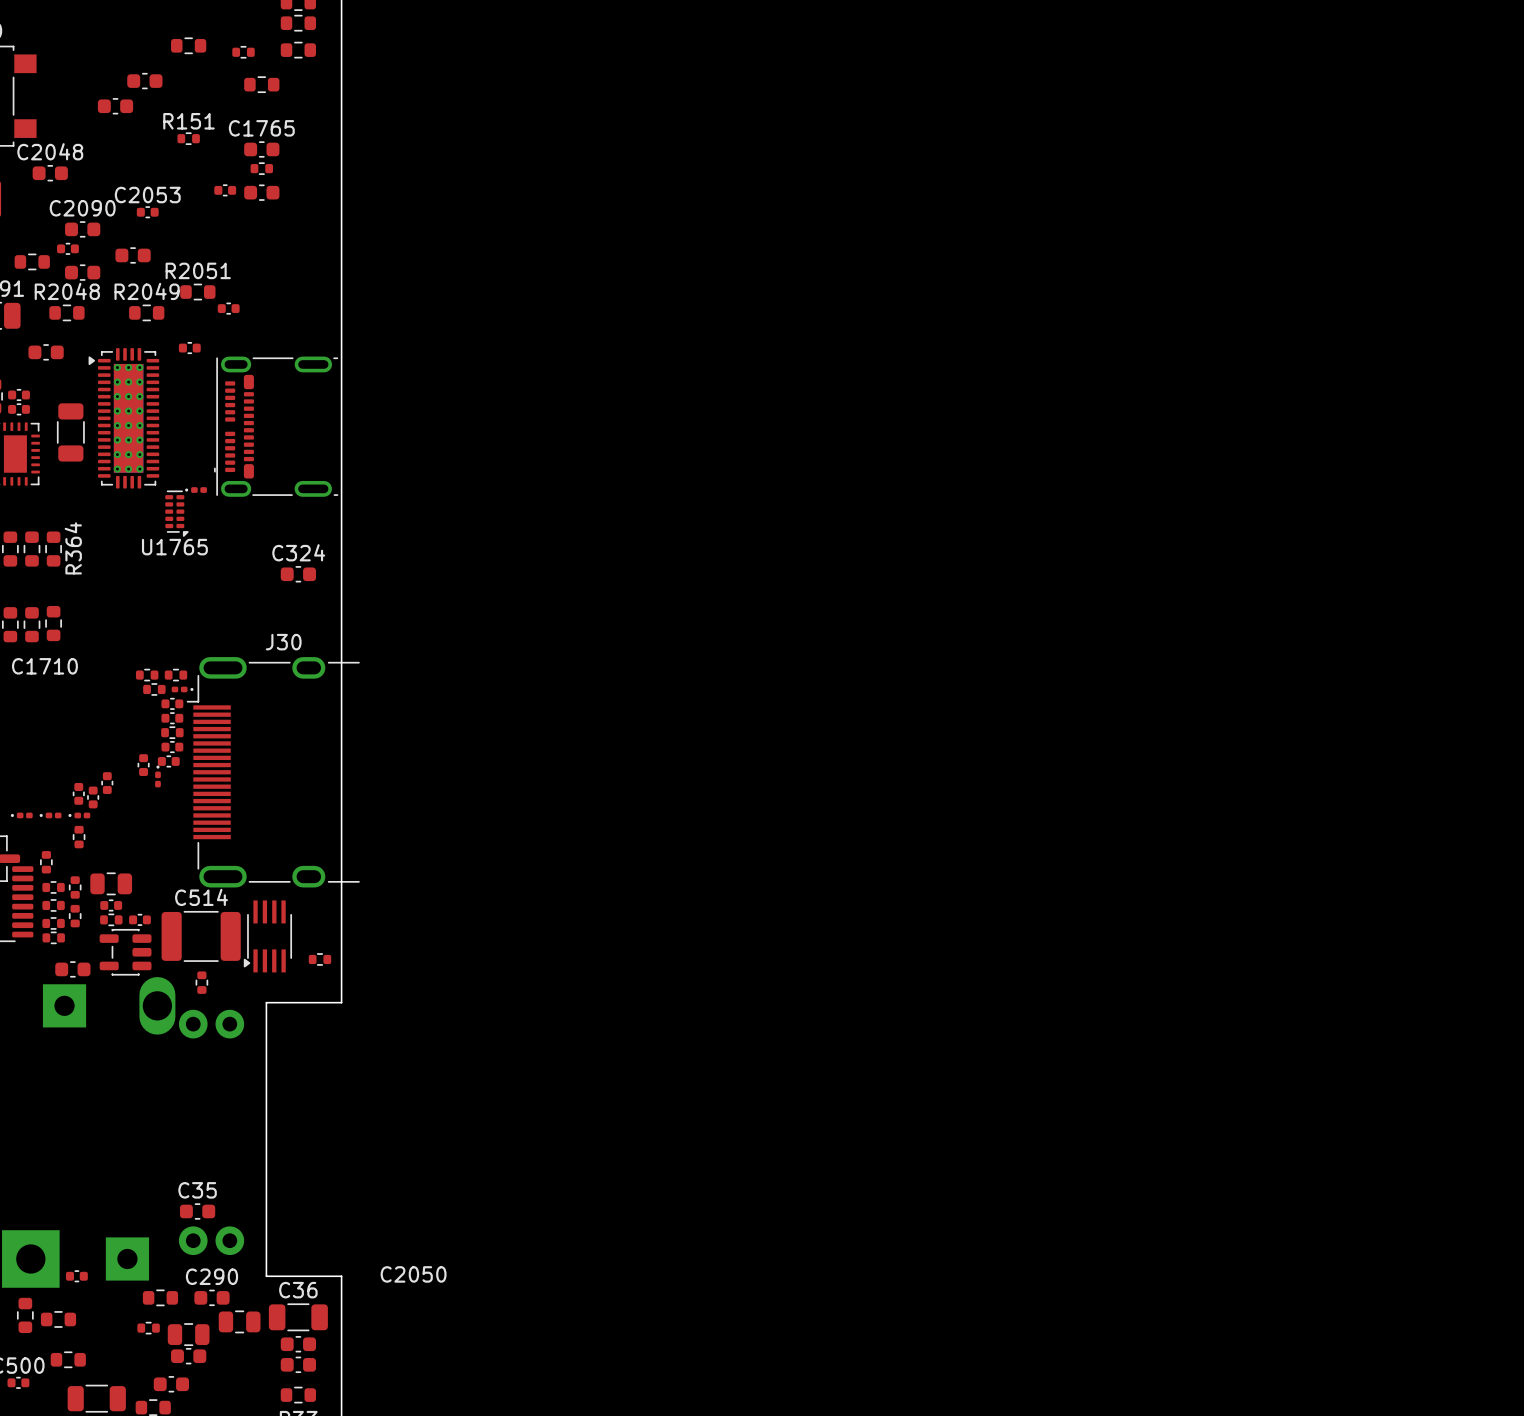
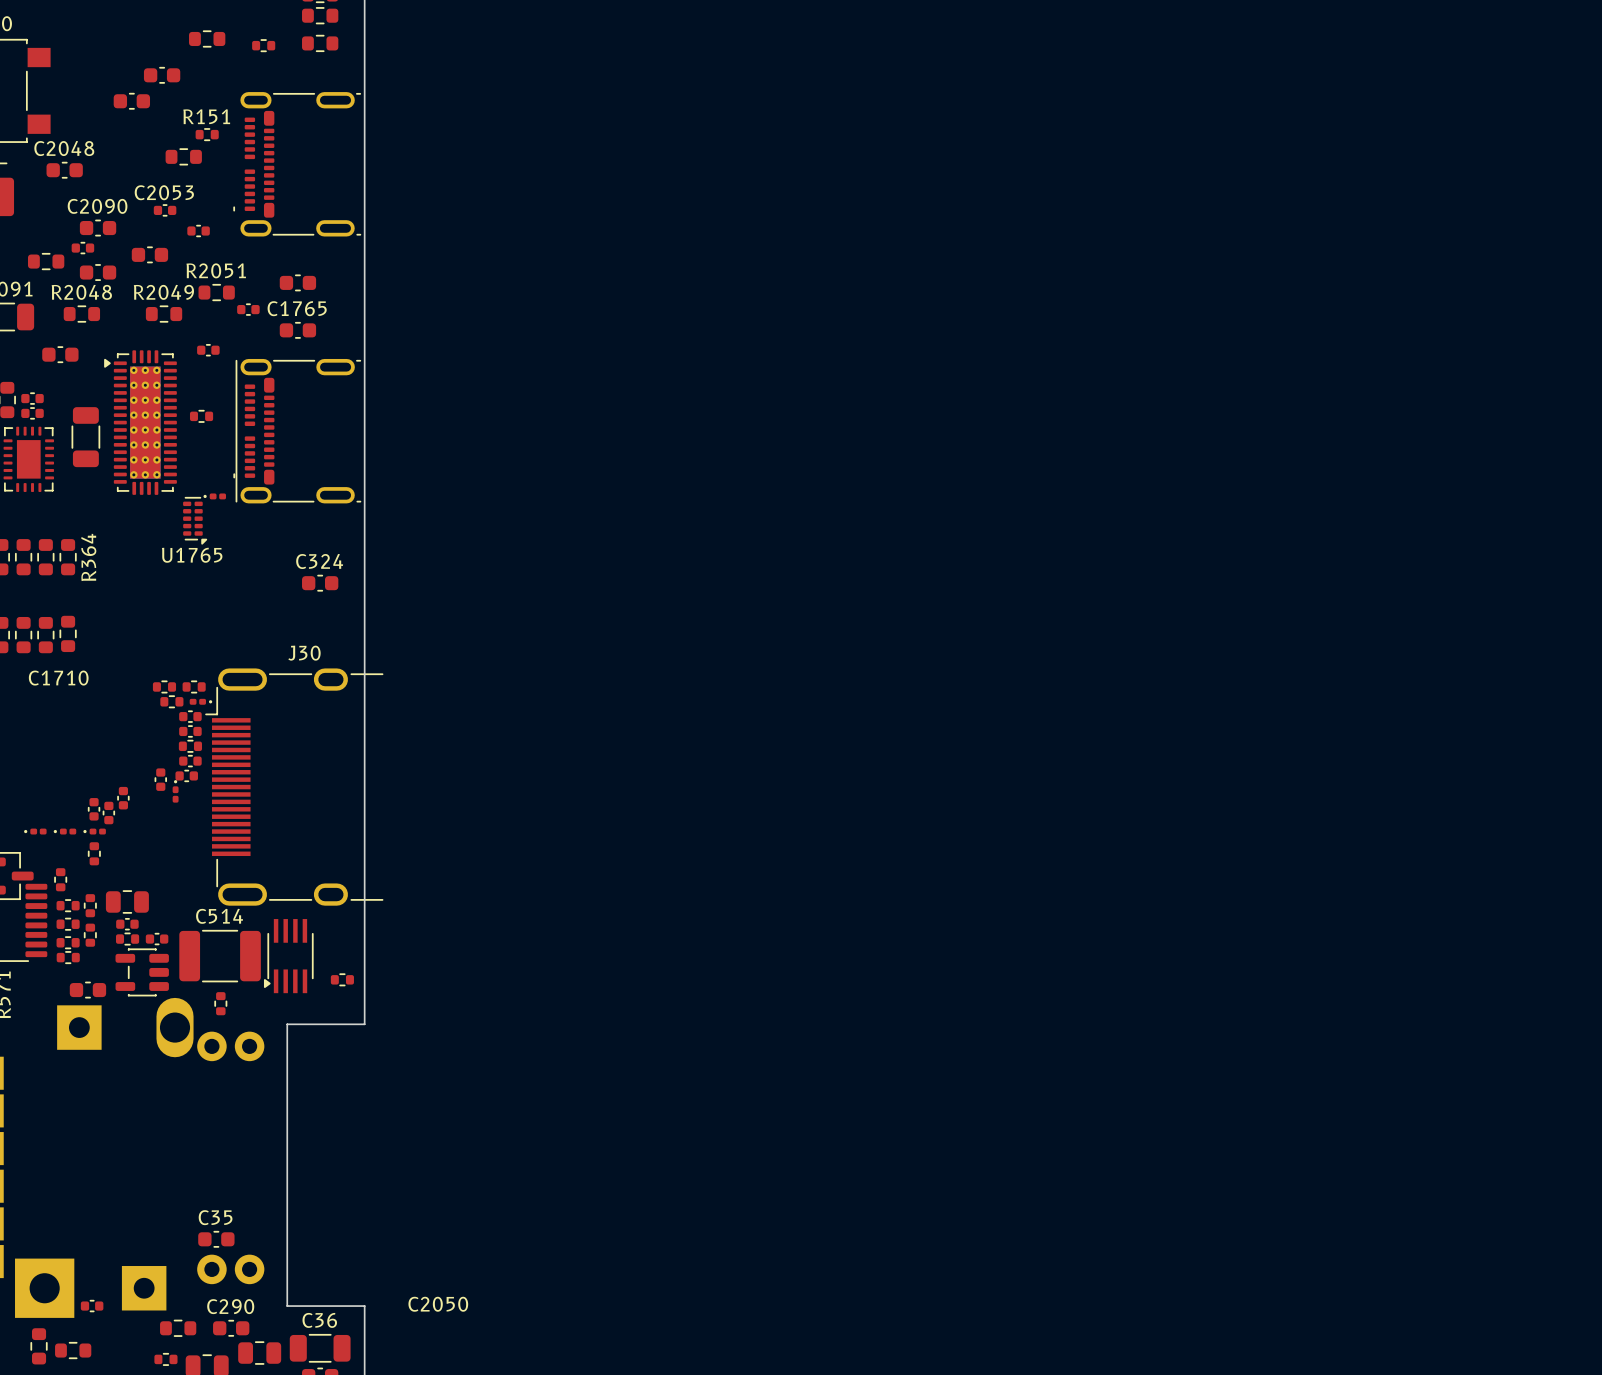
part position: (261, 84) -> (183, 156)
C1765 position: (261, 149) -> (297, 330)
part footprint: [250, 162, 274, 175] -> [233, 92, 362, 237]
part position: (225, 190) -> (198, 231)
part position: (261, 192) -> (297, 282)
part: none -> (201, 416)

